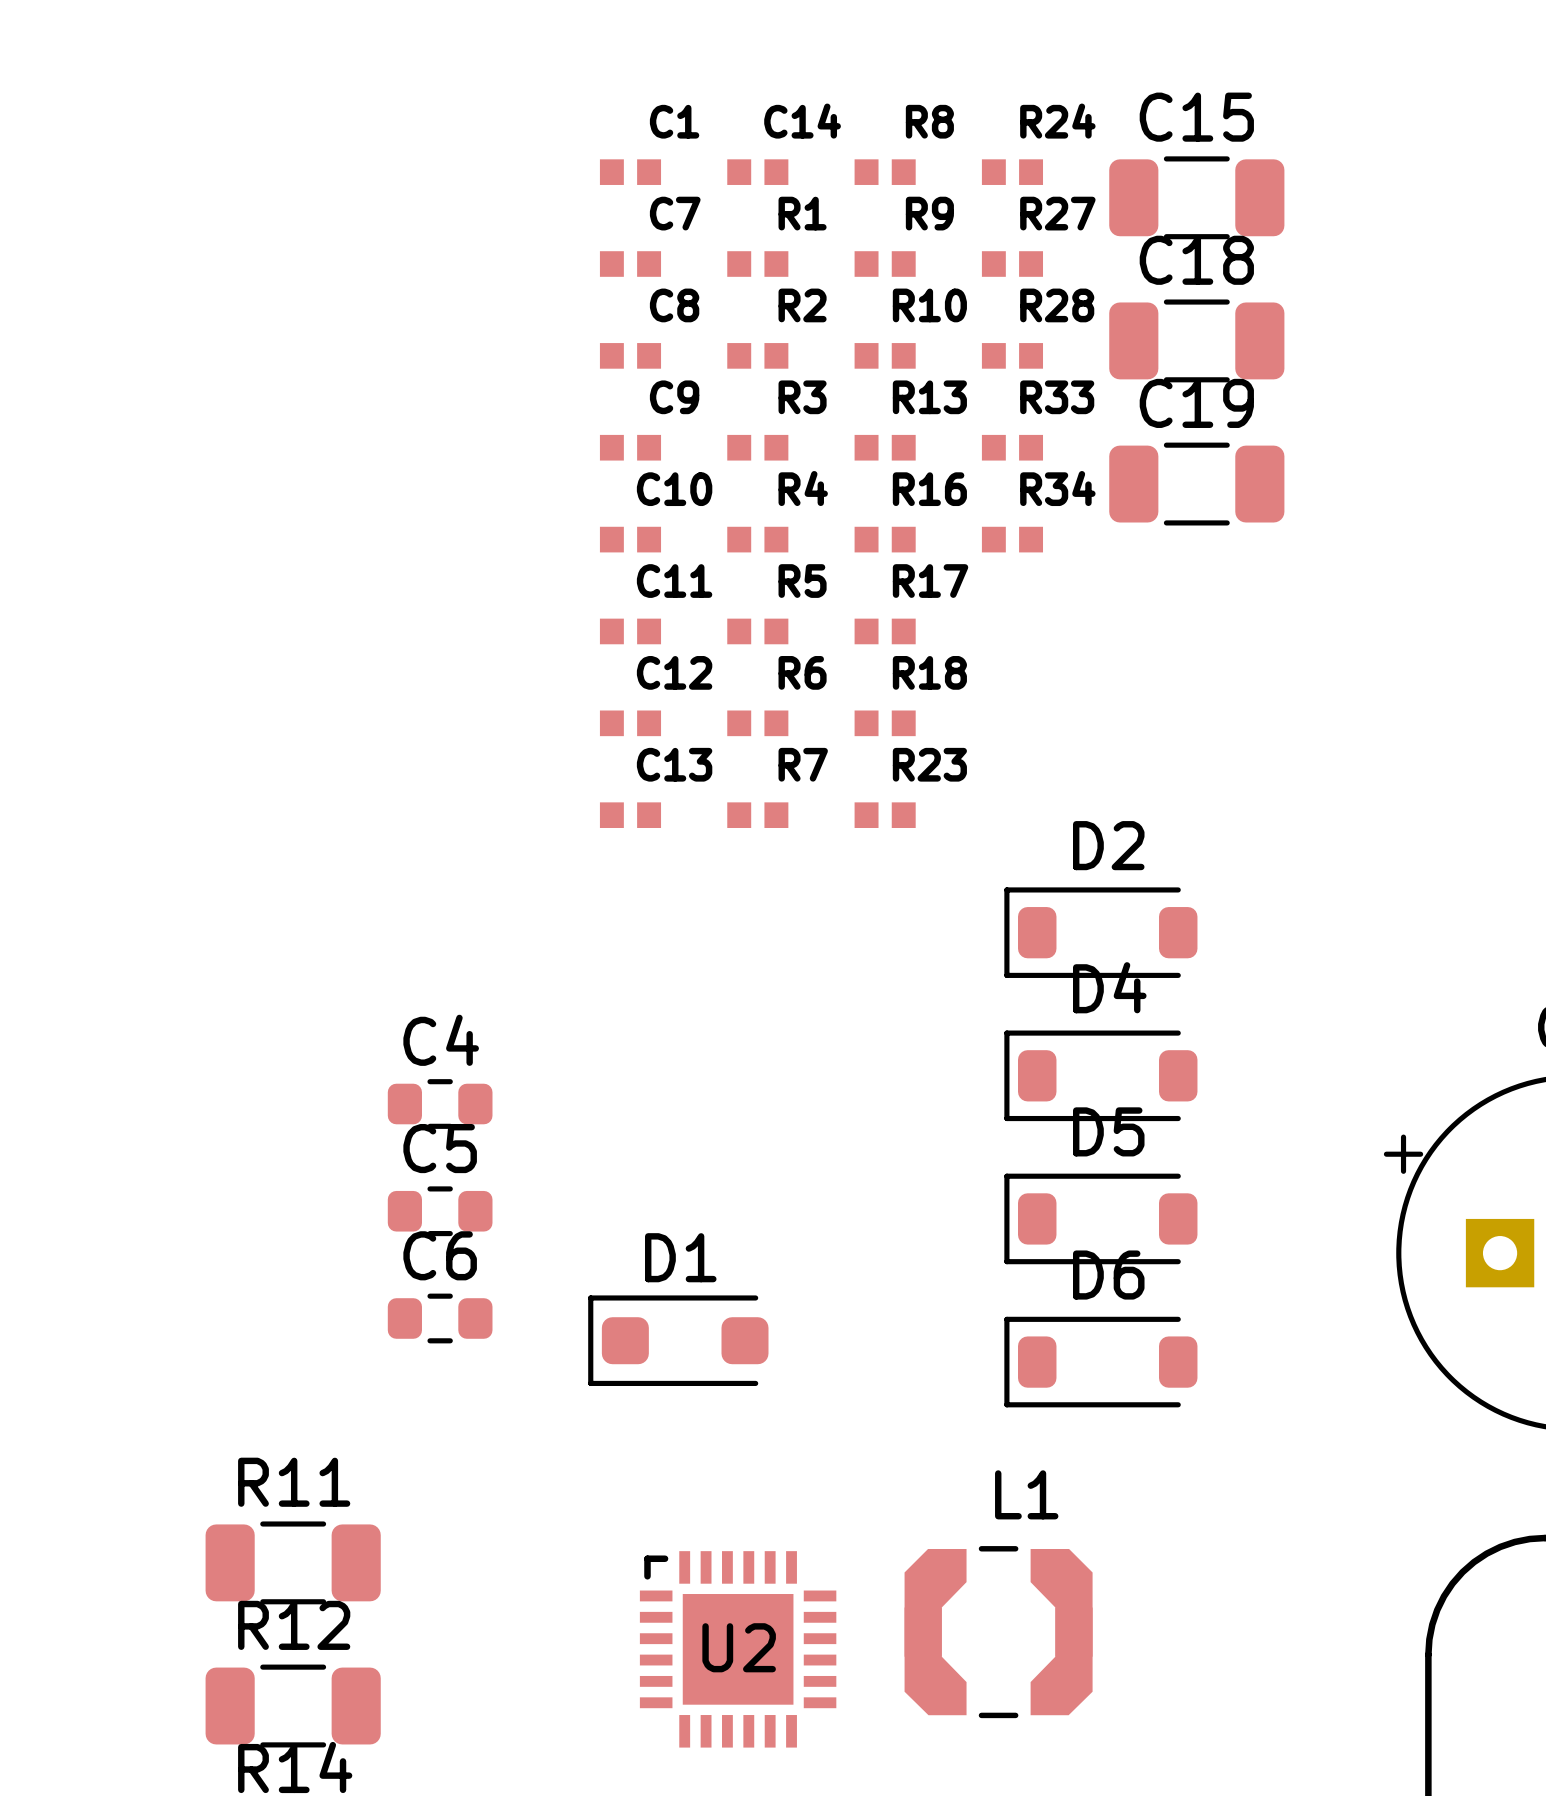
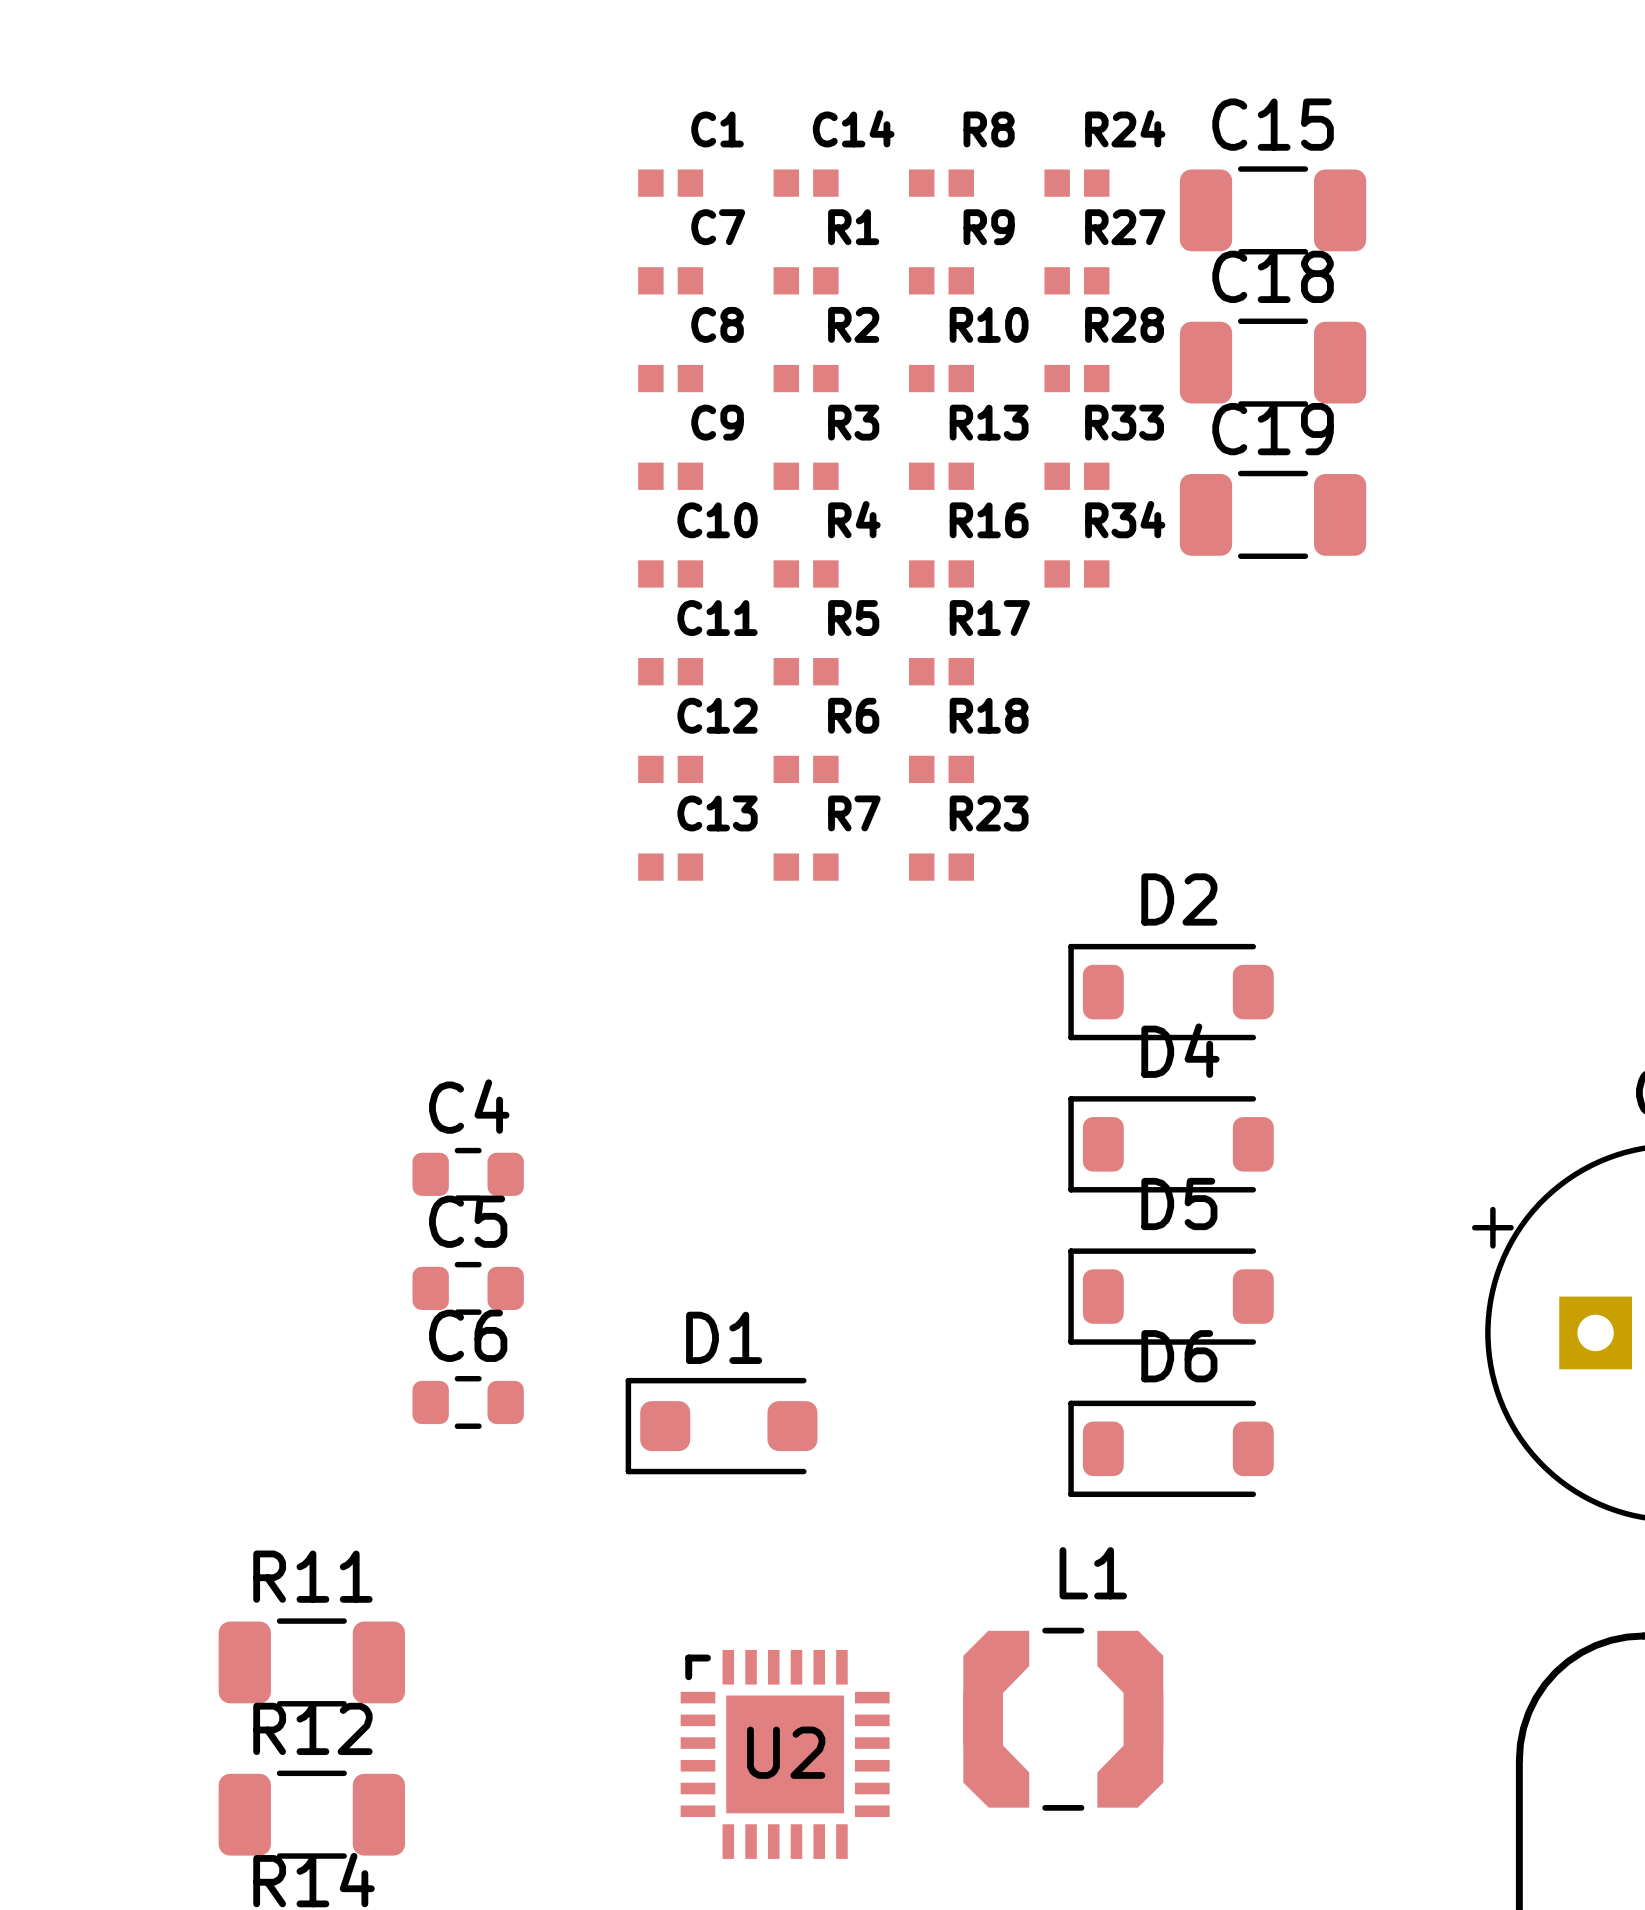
L1 position: (998, 1632) -> (1063, 1719)

